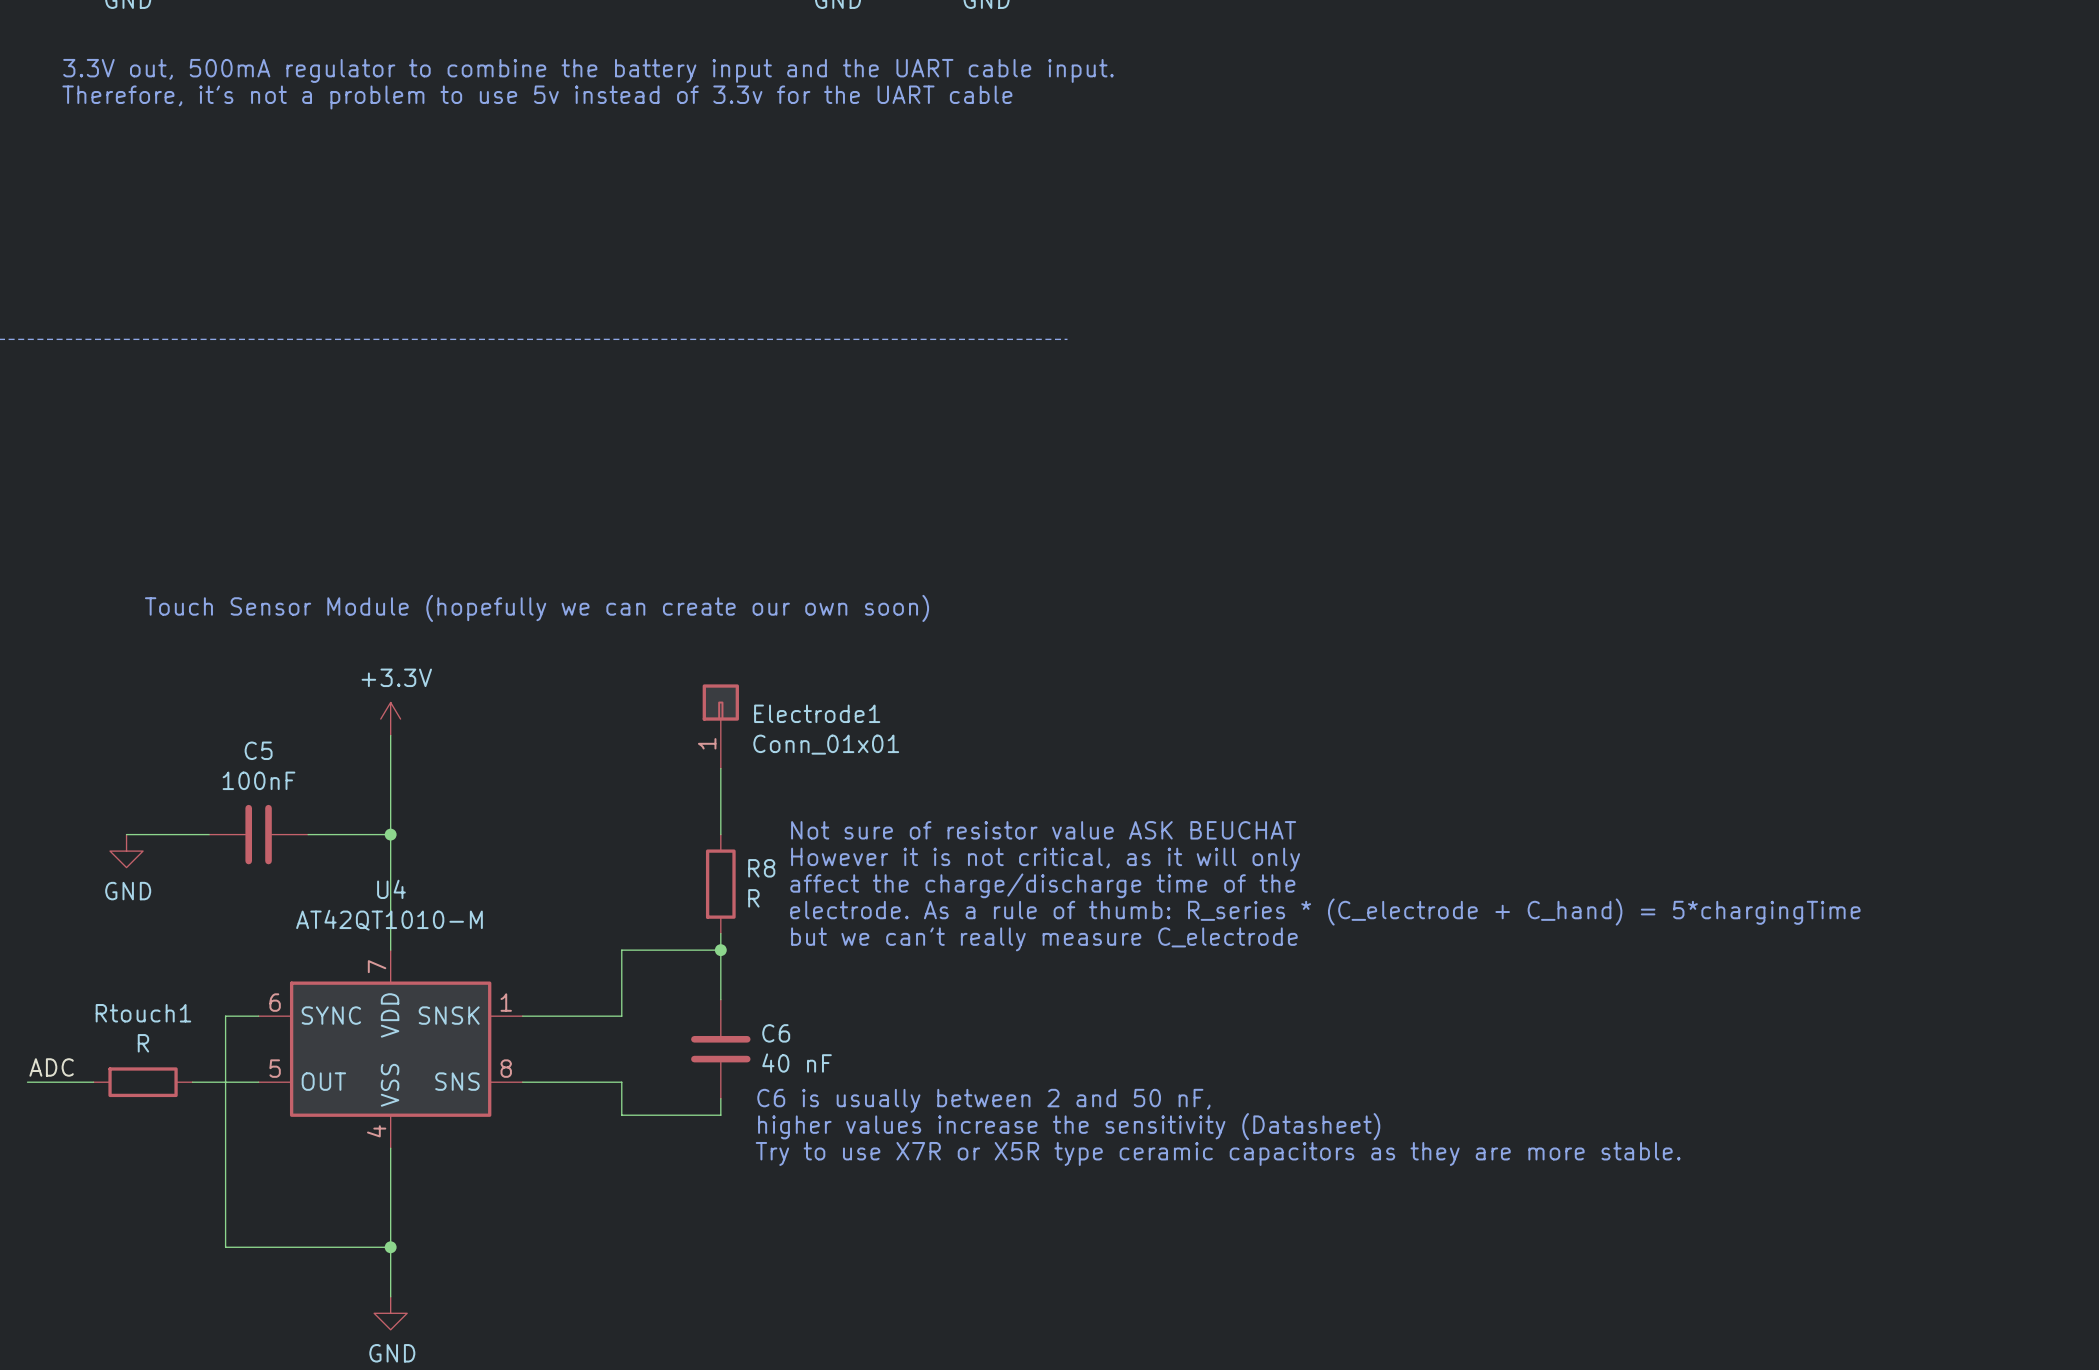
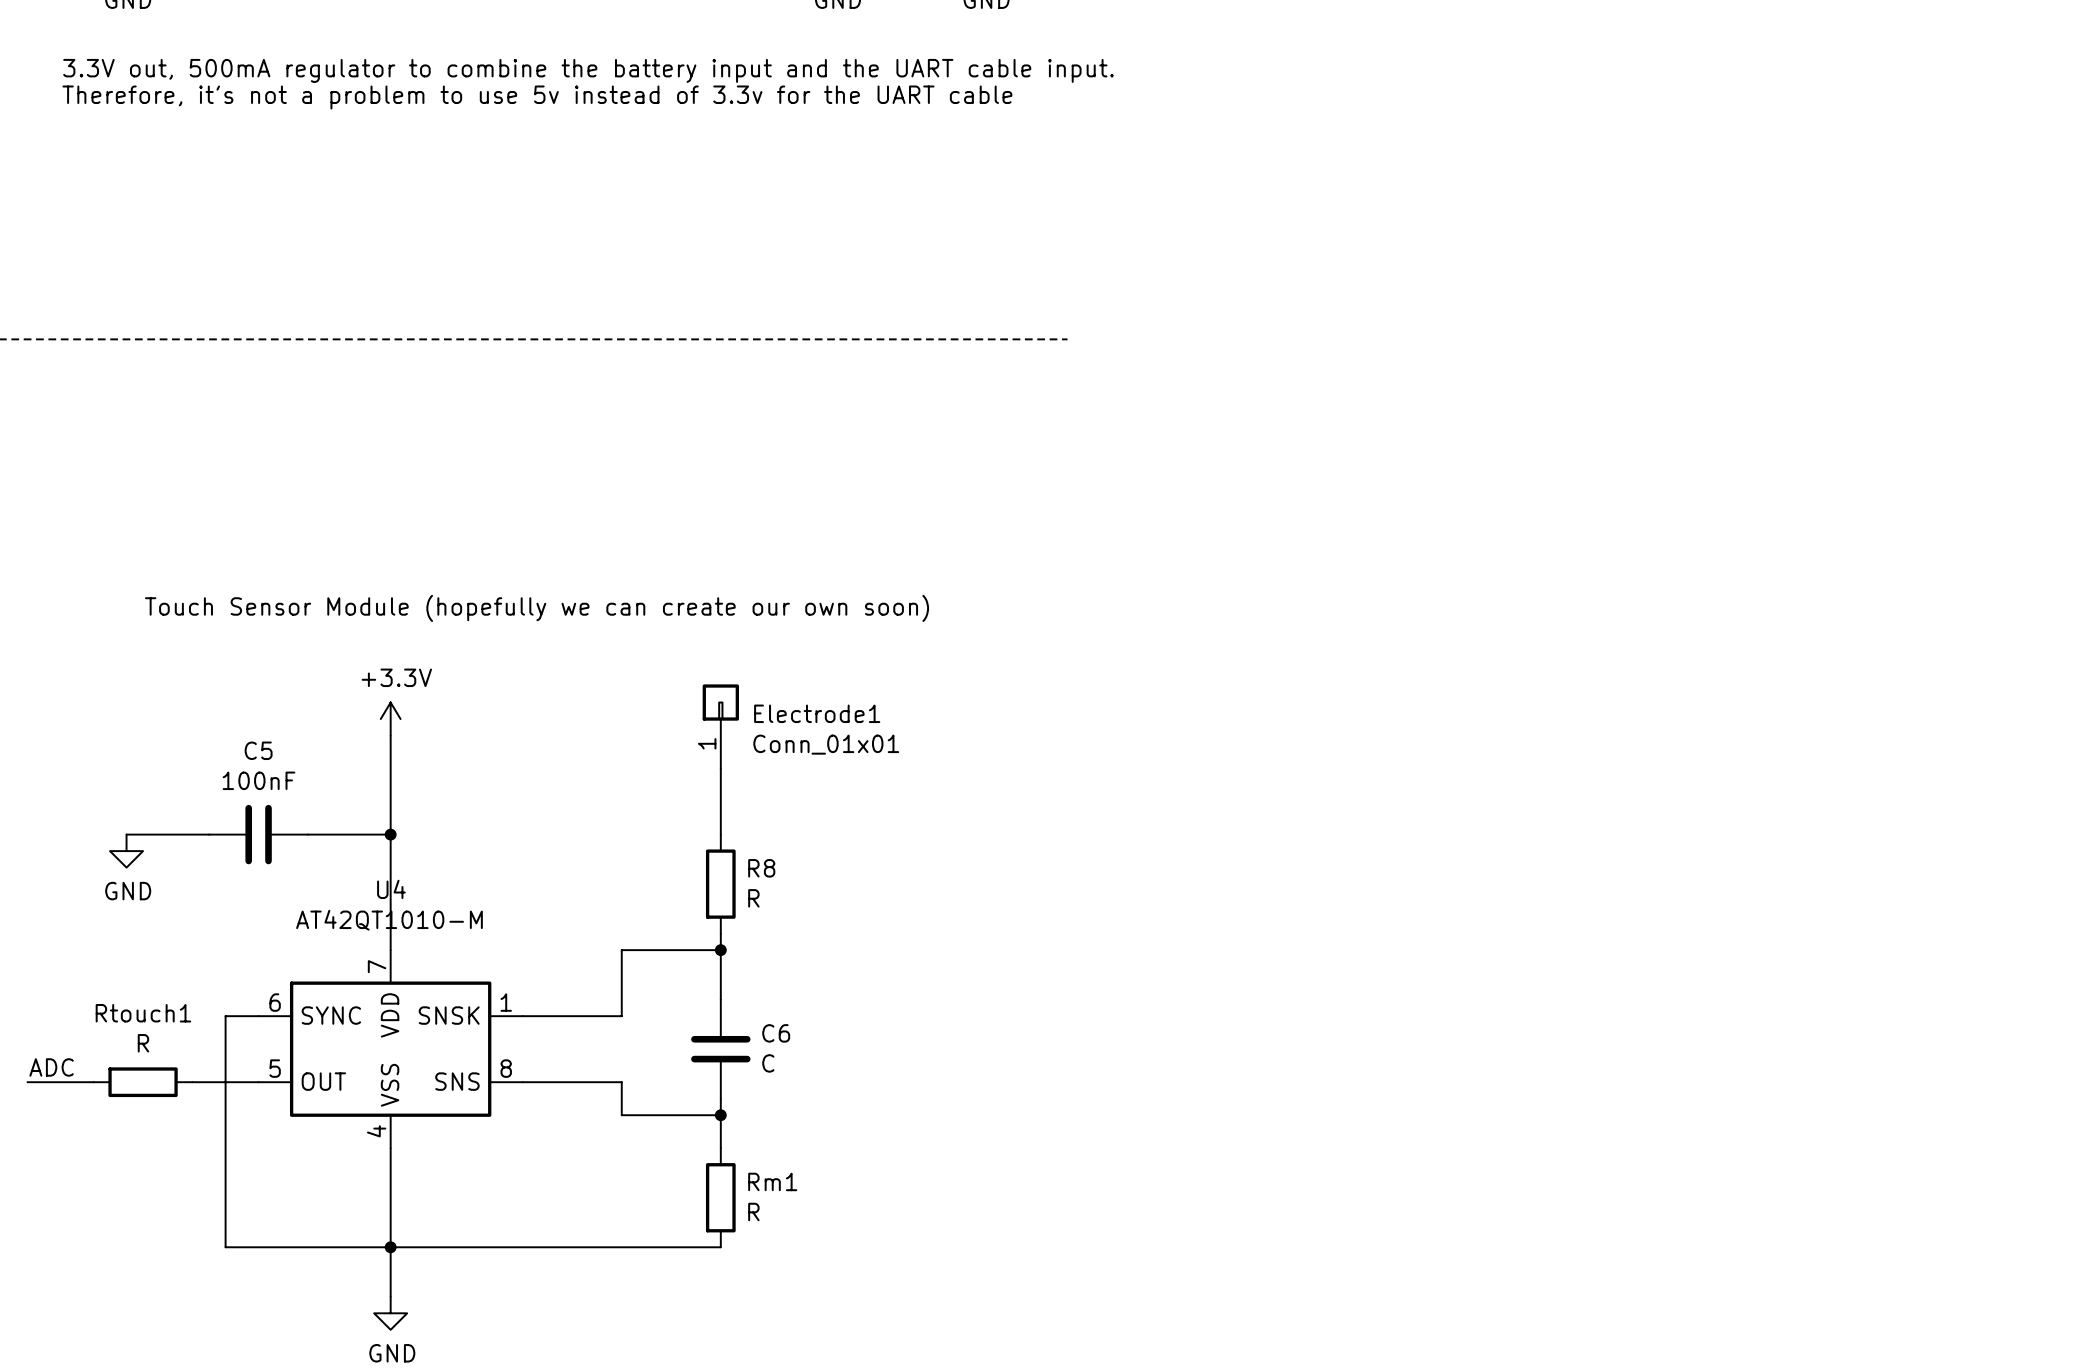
text: Not sure of resistor value ASK BEUCHAT (1043, 830) -> none
text: However it is not critical, as it will only (1045, 859) -> none
text: affect the charge/discharge time of the (1042, 885) -> none
text: electrode. As a rule of thumb: R_series * (C_electrode + C_hand) = 5*chargingTime (1325, 912) -> none
text: but we can't really measure C_electrode (1044, 939) -> none
C6 value: 40 nF (797, 1063) -> C (768, 1063)
text: C6 is usually between 2 and 50 nF, (983, 1100) -> none
wire: none -> (720, 1115) (720, 1148)
junction: none -> (720, 1115)
text: higher values increase the sensitivity (Datasheet) (1069, 1126) -> none
text: Try to use X7R or X5R type ceramic capacitors as they are more stable. (1218, 1153) -> none
Rm1: none -> R (720, 1197)
wire: none -> (390, 1247) (720, 1247)

